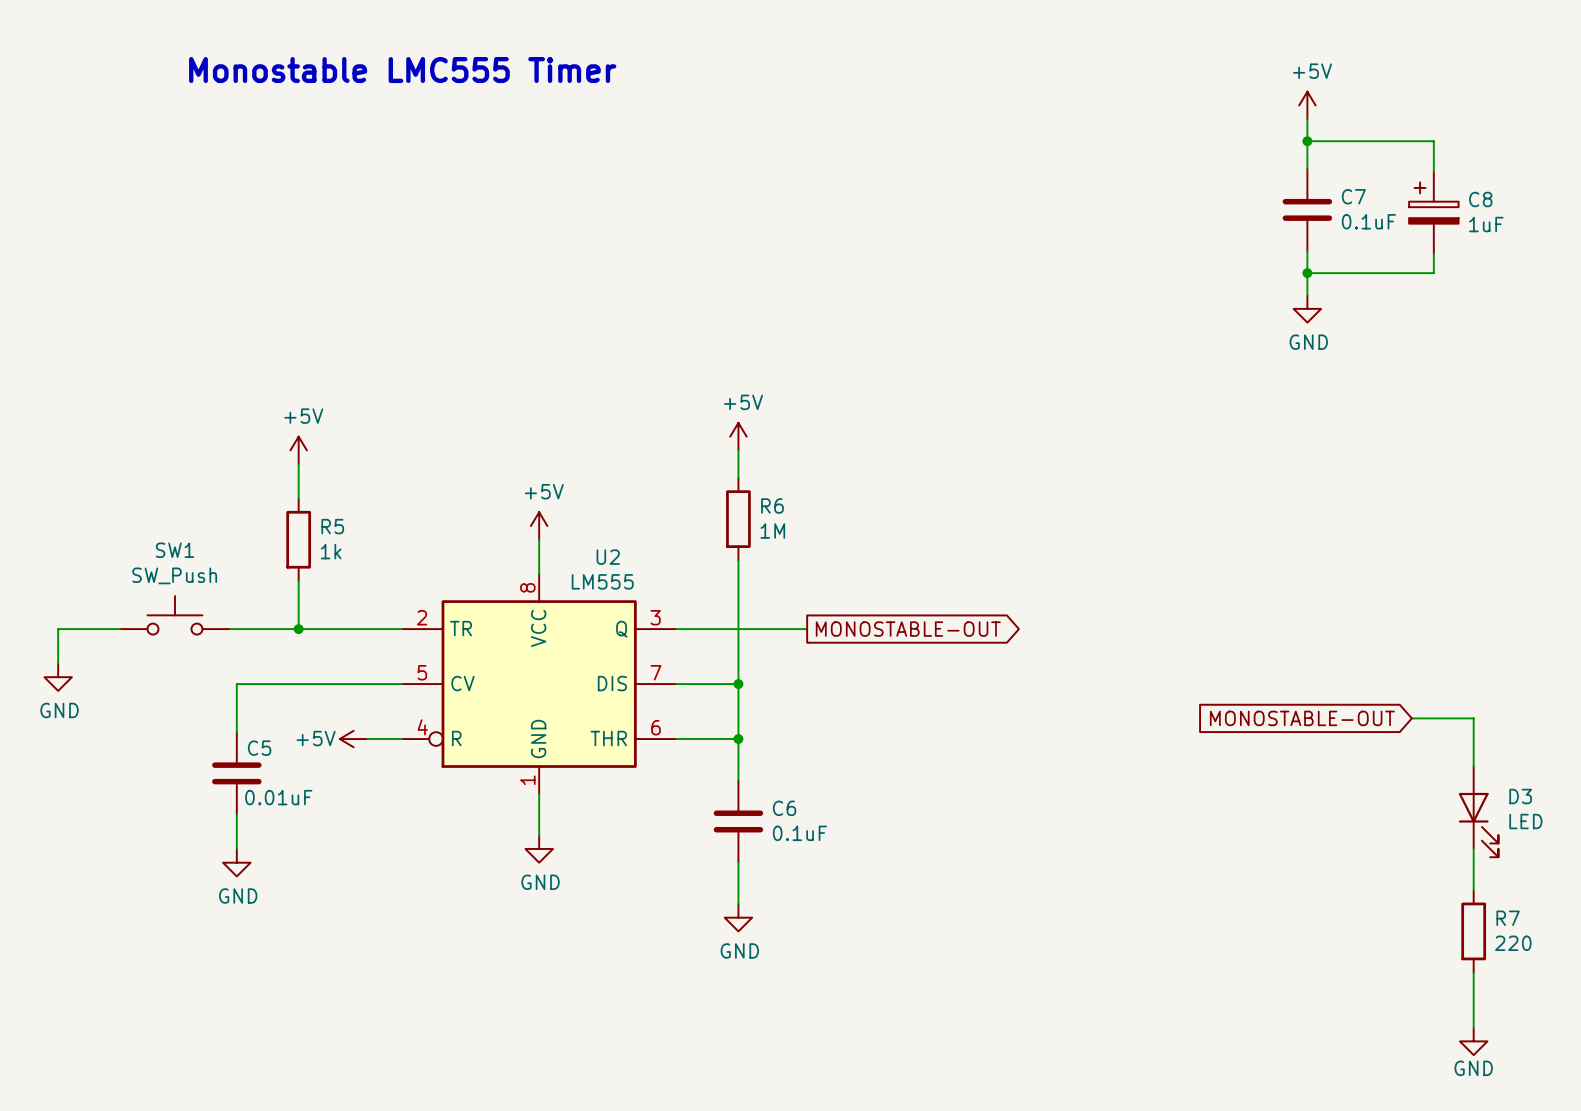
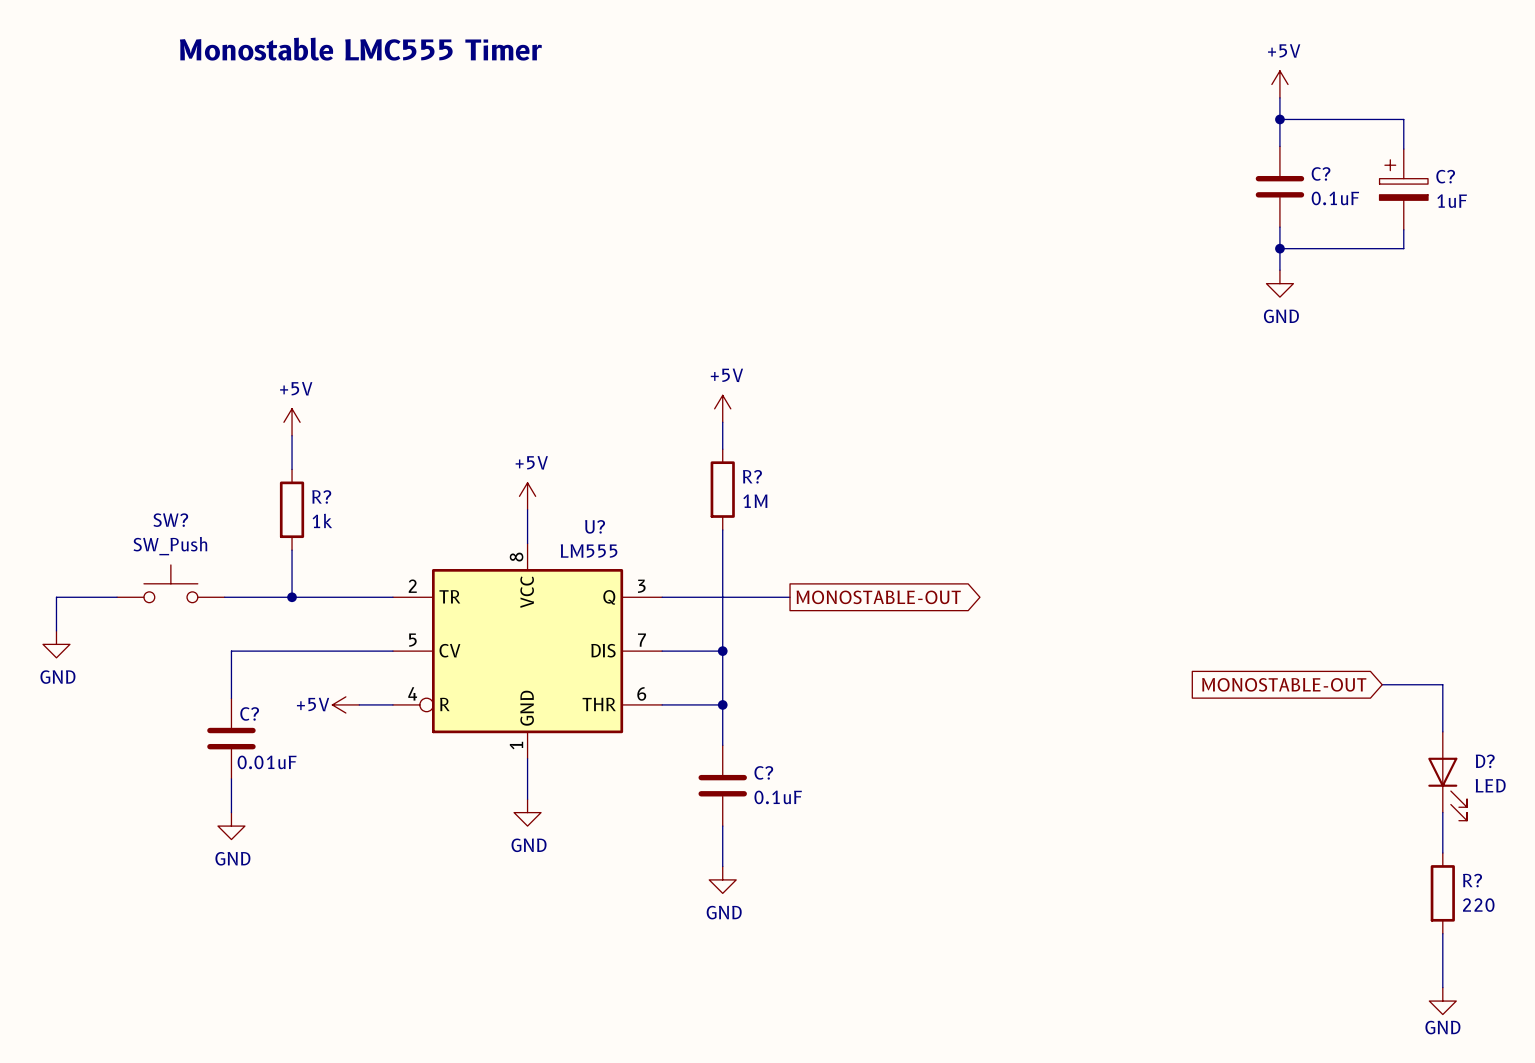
C7 name: C7 (1353, 196) -> C? (1321, 173)
C8 name: C8 (1480, 199) -> C? (1445, 176)
R6 name: R6 (772, 505) -> R? (752, 476)
R5 name: R5 (332, 526) -> R? (321, 496)
SW1 name: SW1 (174, 550) -> SW? (170, 520)
U2 name: U2 (608, 557) -> U? (595, 526)
C5 name: C5 (259, 748) -> C? (249, 713)
D3 name: D3 (1520, 796) -> D? (1485, 761)
C6 name: C6 (784, 808) -> C? (763, 772)
R7 name: R7 (1508, 918) -> R? (1472, 880)

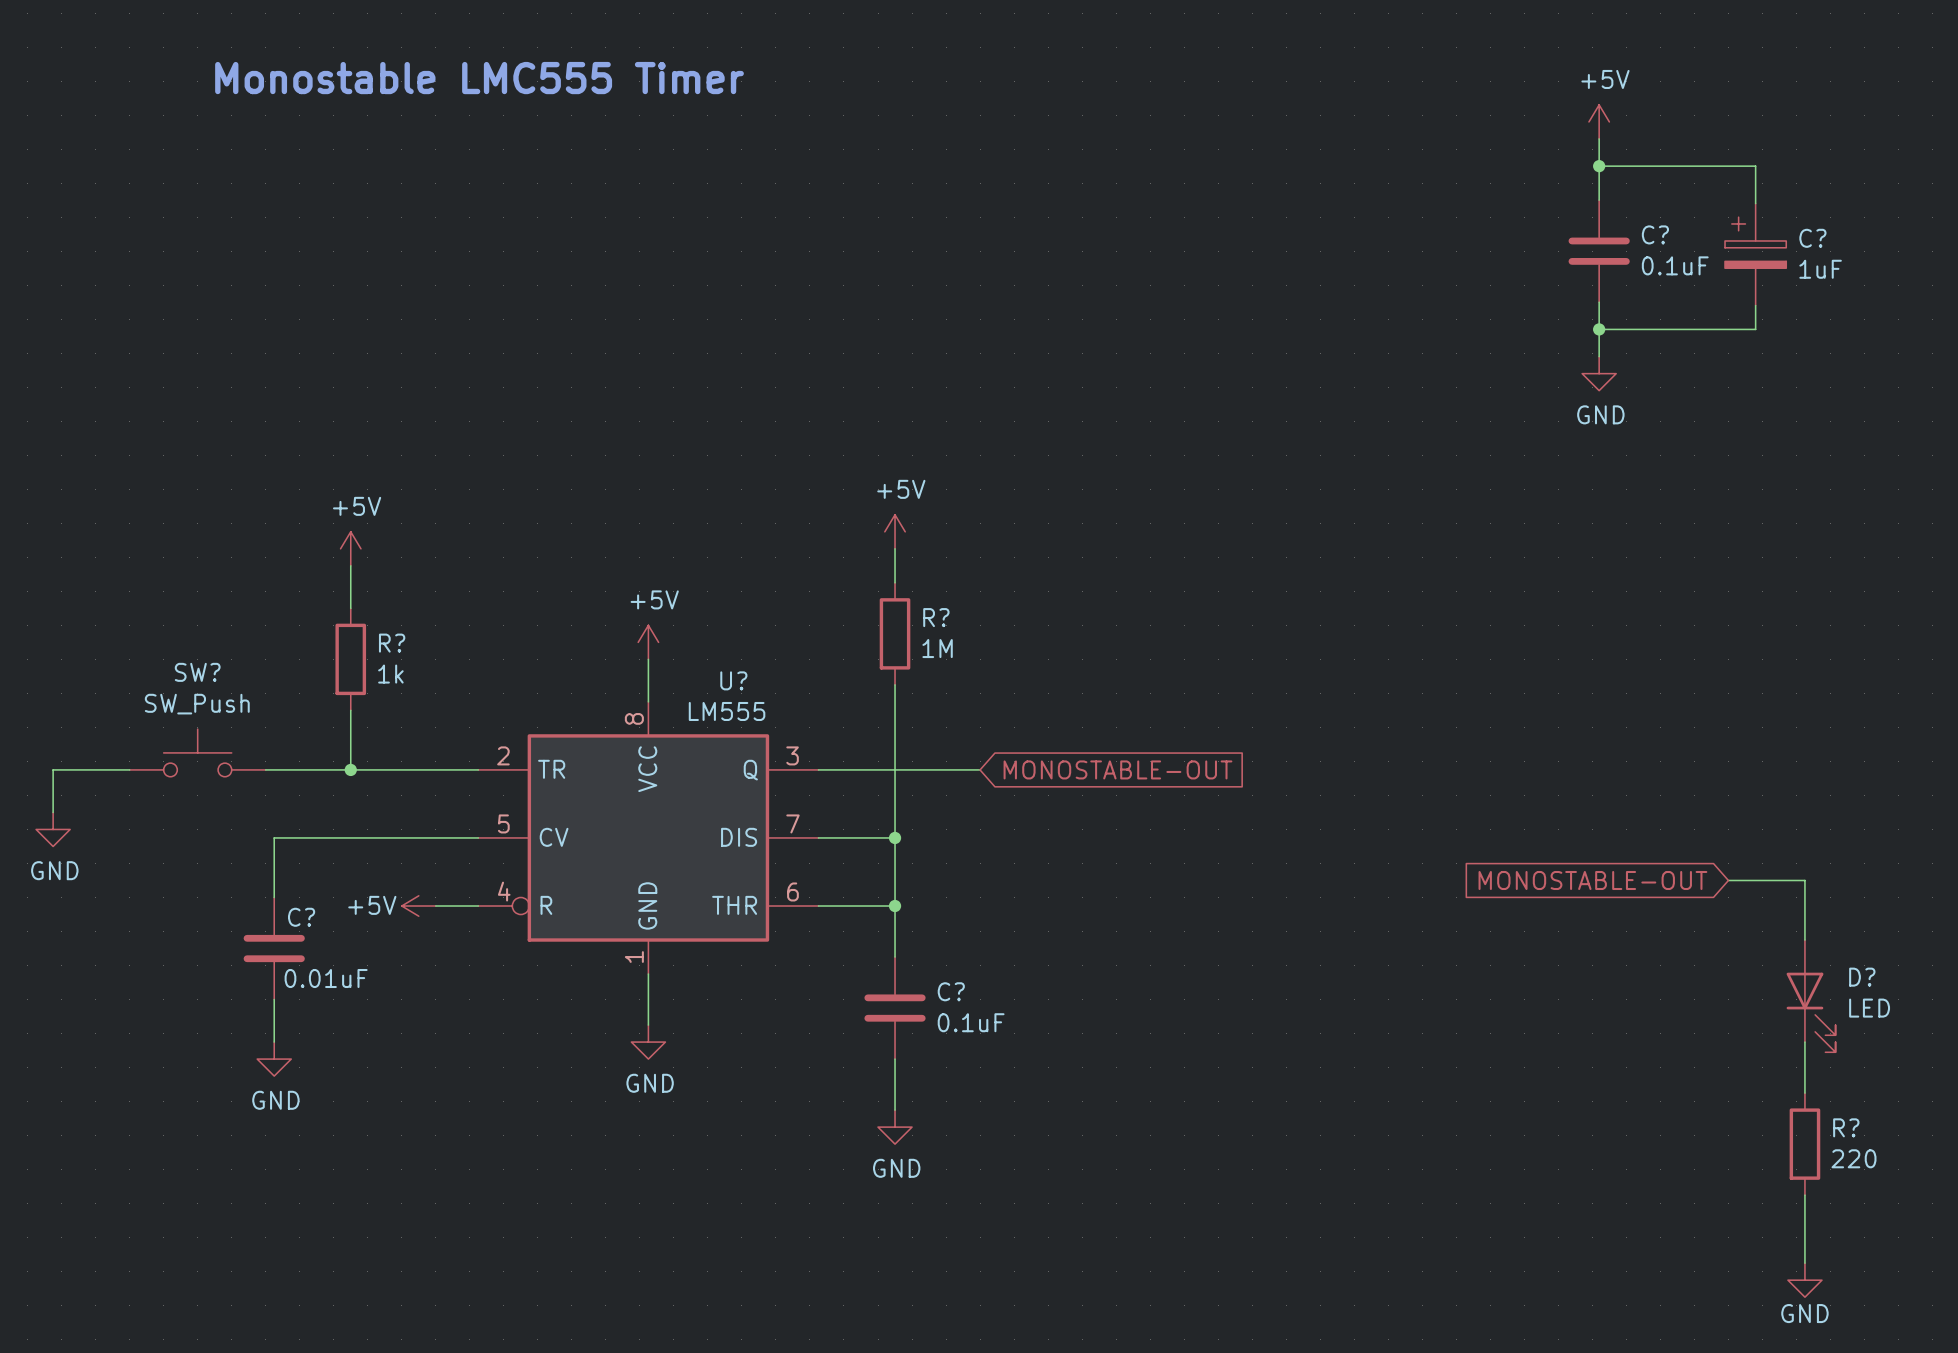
global label shape: output (878, 597) -> input (1117, 769)

